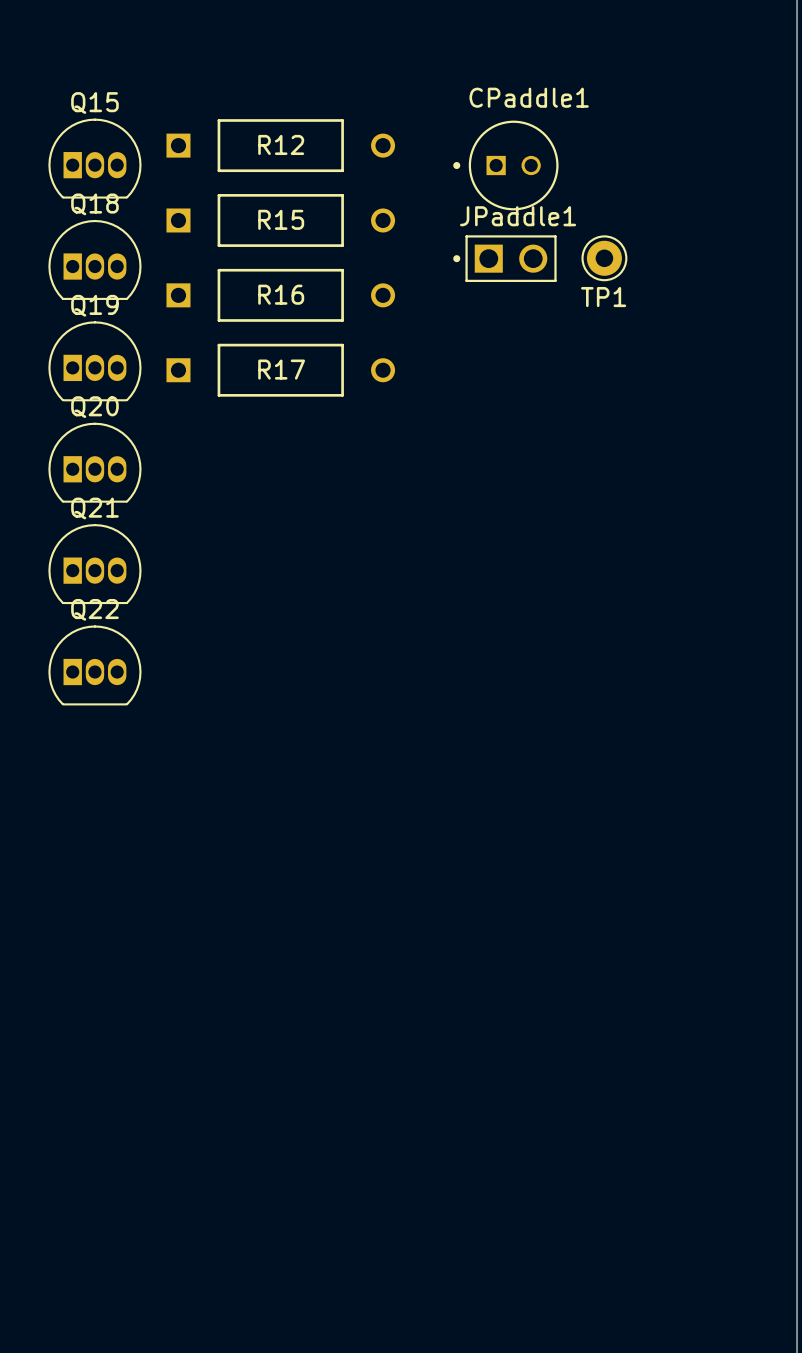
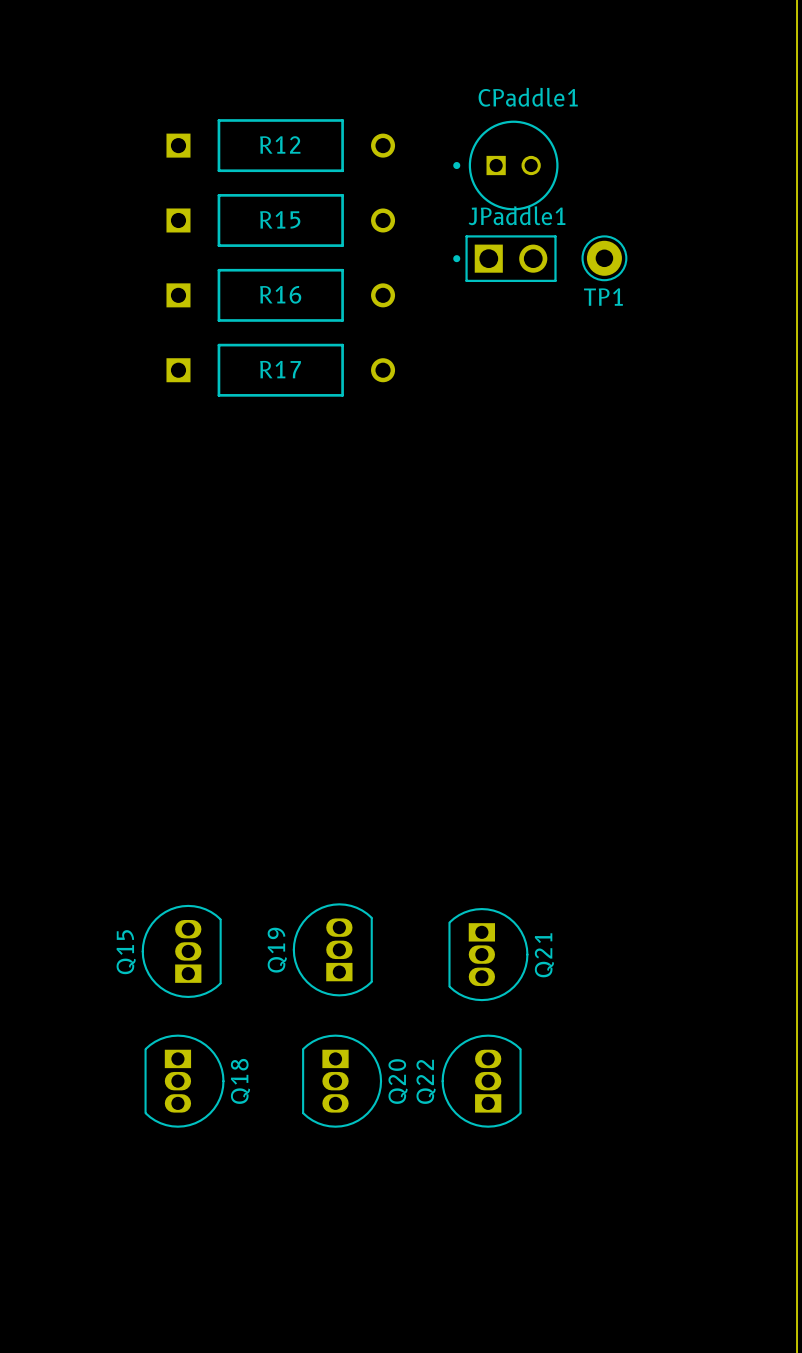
Q15 rotation: 0° (94, 158) -> 90° counterclockwise (181, 951)
Q15 position: (94, 158) -> (181, 951)
Q18 rotation: 0° (94, 259) -> 90° clockwise (184, 1081)
Q18 position: (94, 259) -> (184, 1081)
Q19 rotation: 0° (94, 361) -> 90° counterclockwise (332, 949)
Q19 position: (94, 361) -> (332, 949)
Q20 rotation: 0° (94, 462) -> 90° clockwise (342, 1081)
Q20 position: (94, 462) -> (342, 1081)
Q21 rotation: 0° (94, 564) -> 90° clockwise (488, 954)
Q21 position: (94, 564) -> (488, 954)
Q22 rotation: 0° (94, 665) -> 90° counterclockwise (481, 1081)
Q22 position: (94, 665) -> (481, 1081)

